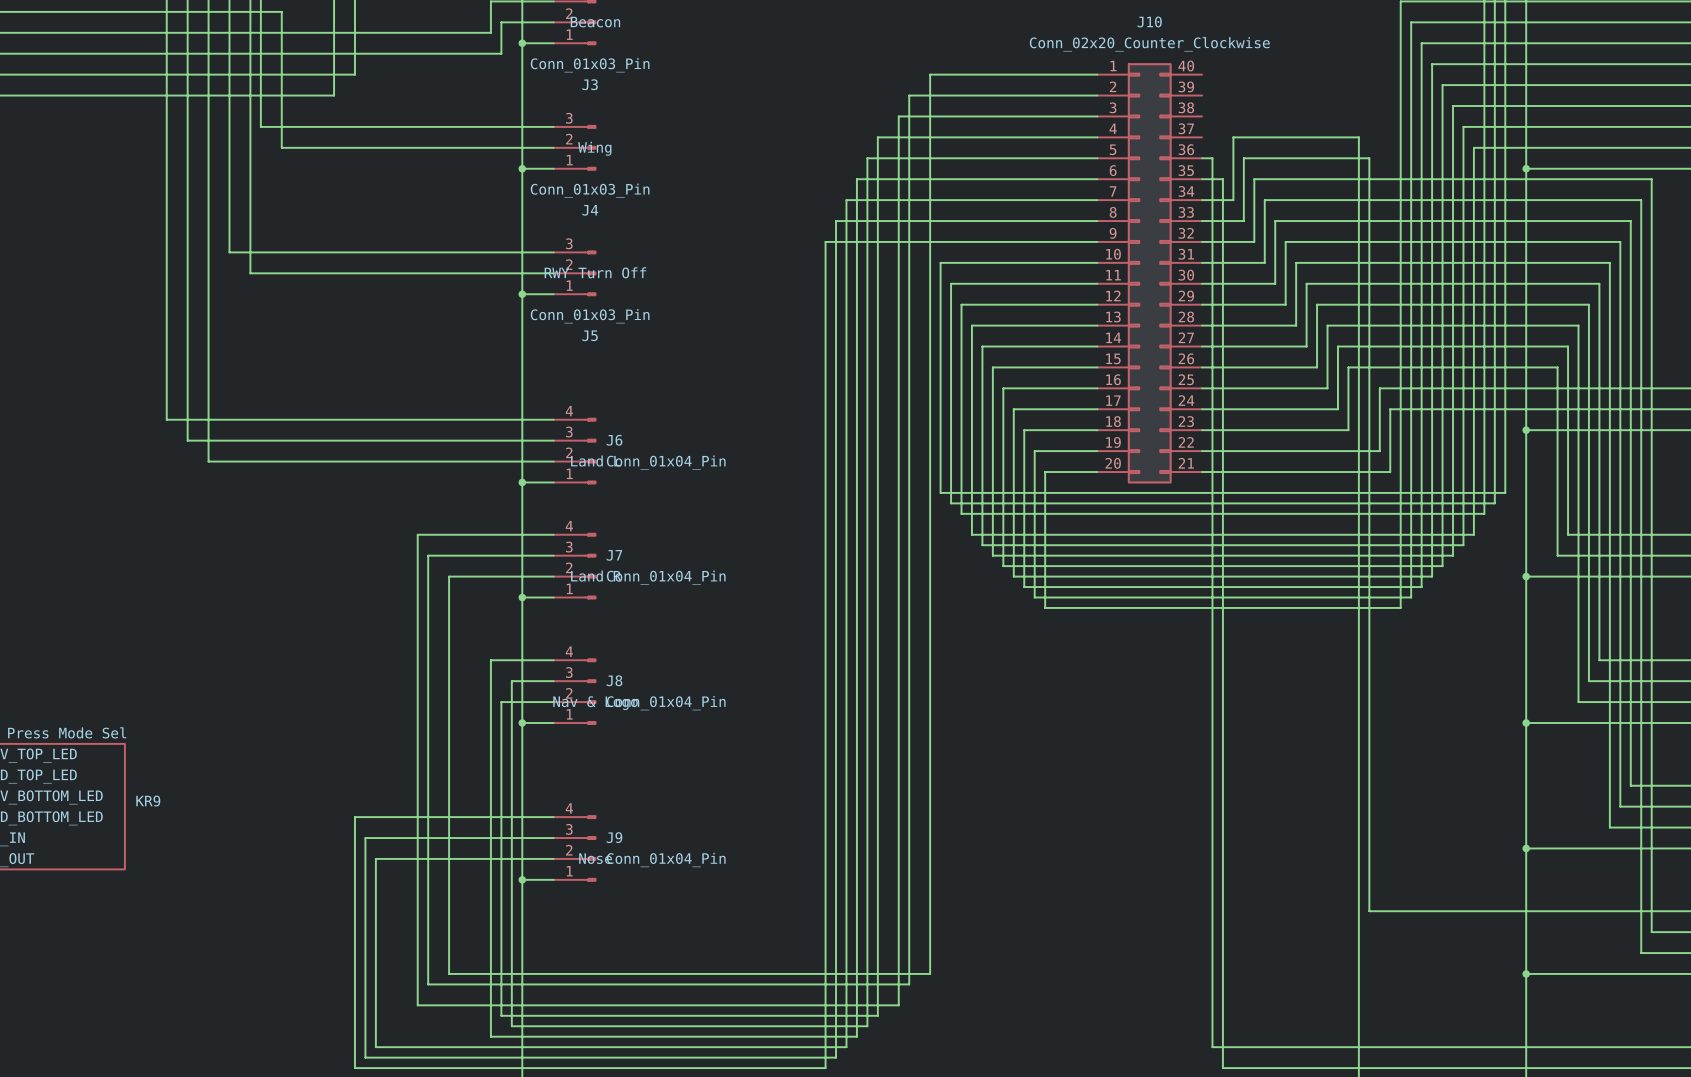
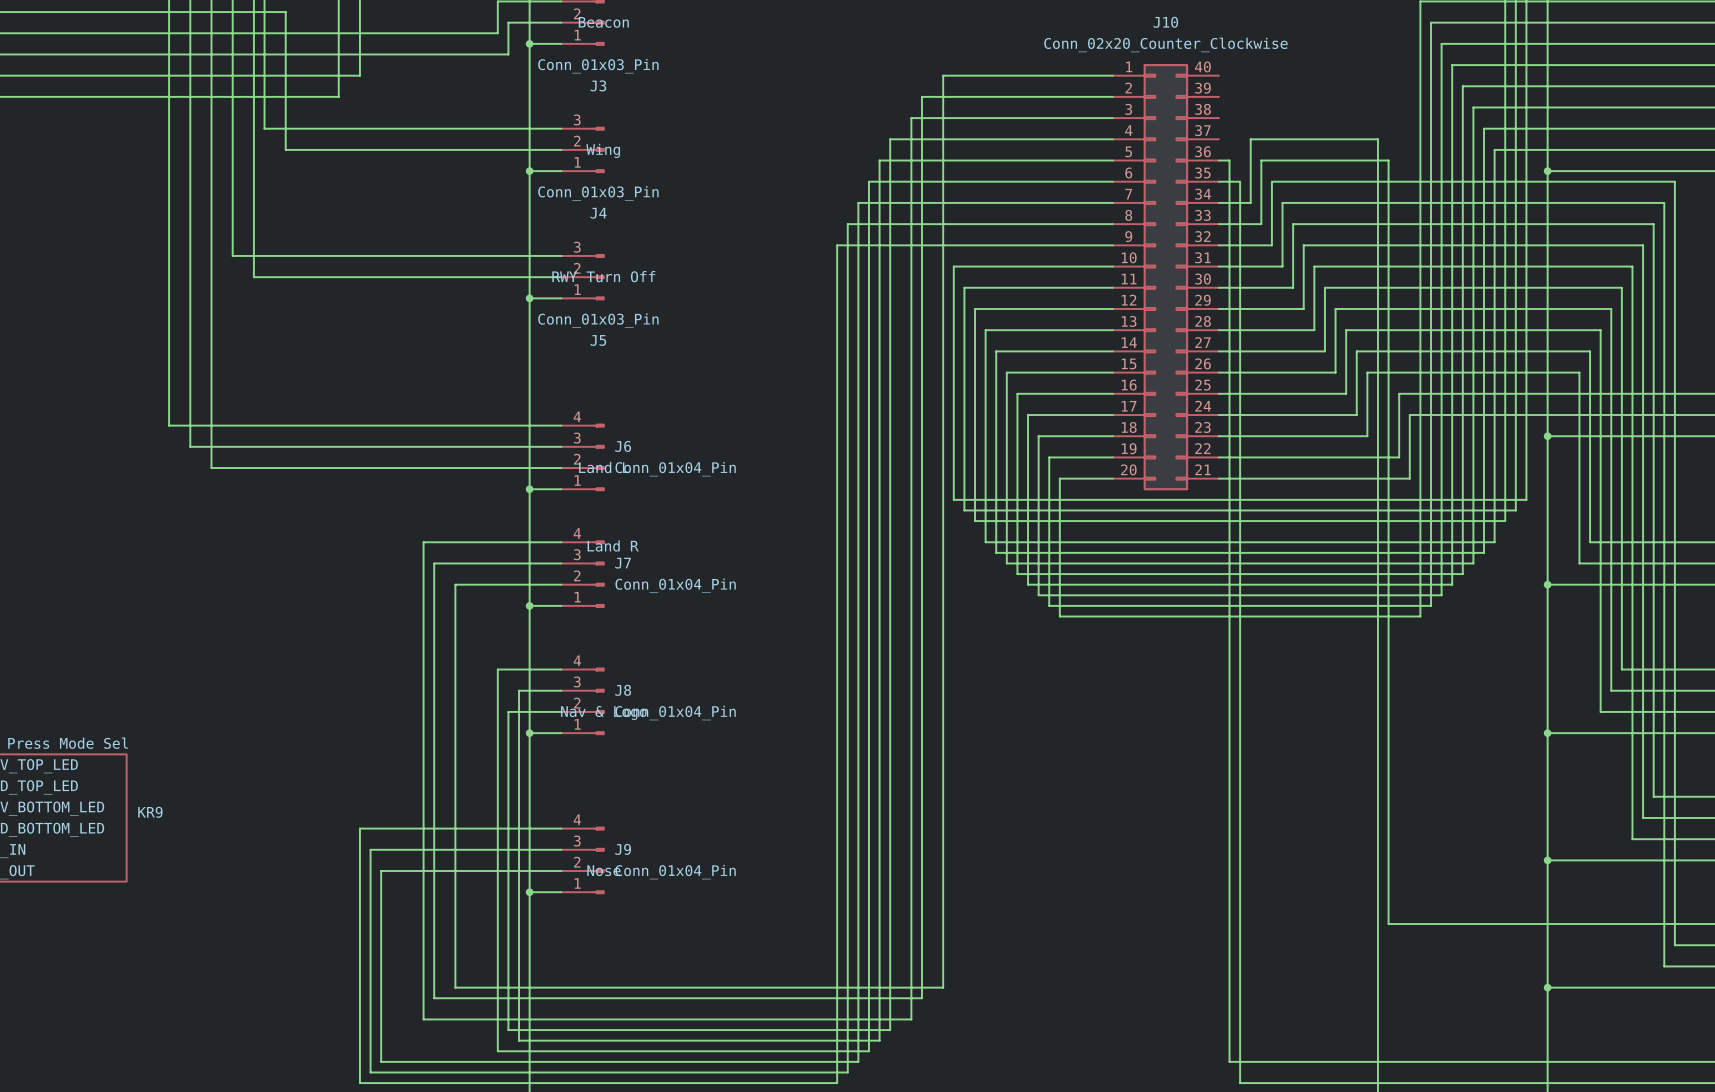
J7 text position: Land R (596, 576) -> Land R (613, 545)

